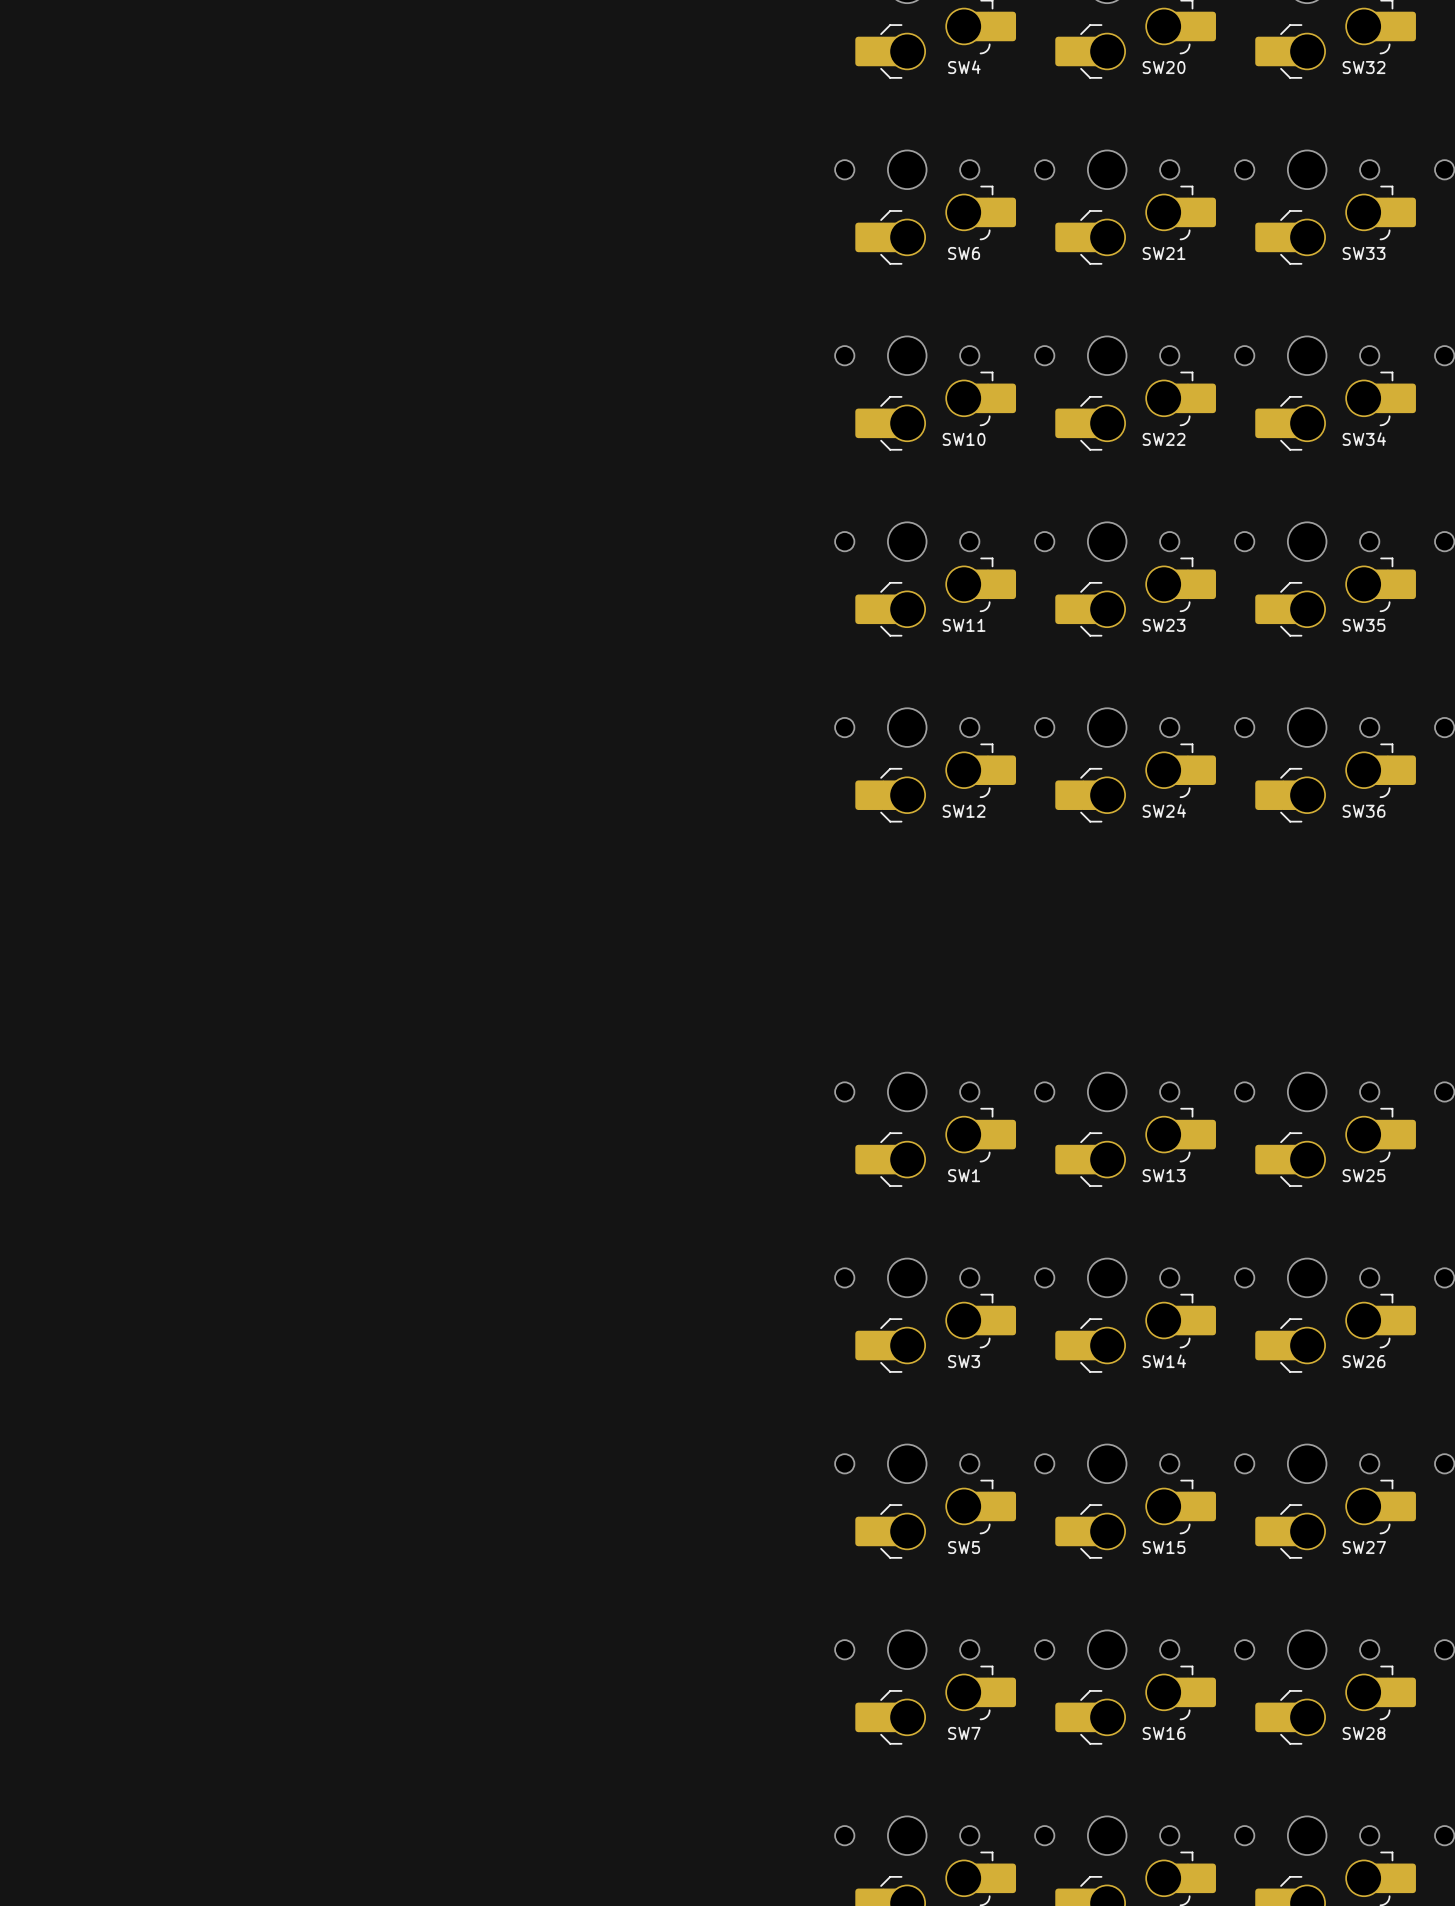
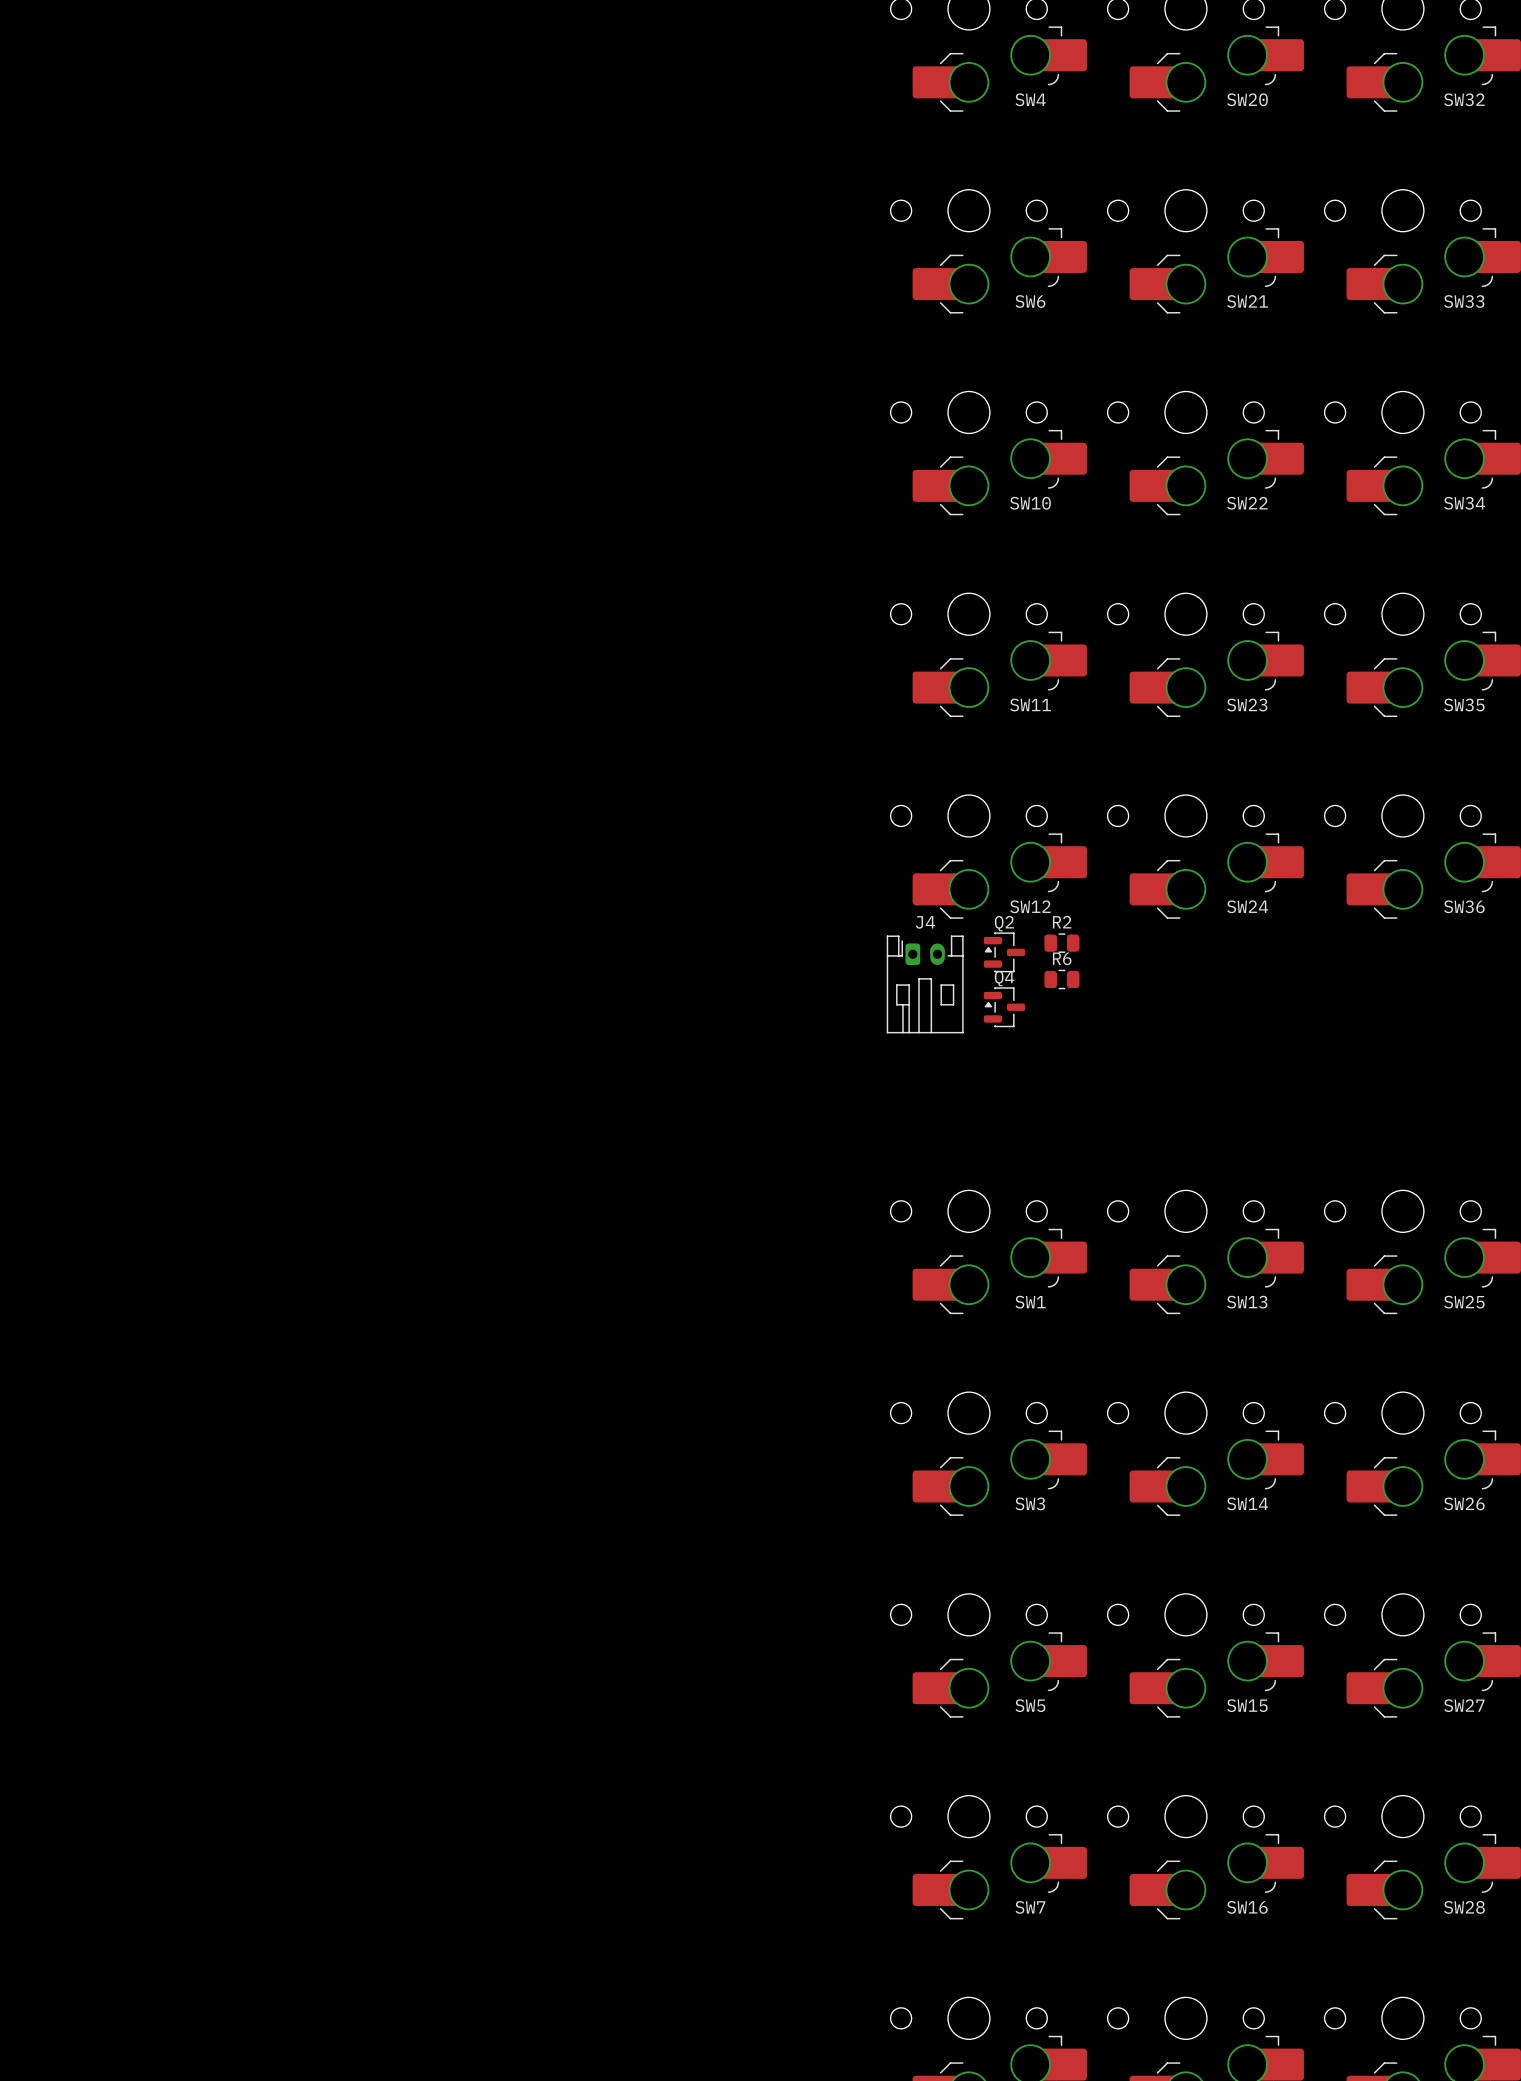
R2: none -> (1061, 943)
Q2: none -> (1004, 952)
R6: none -> (1061, 979)
J4: none -> (925, 984)
Q4: none -> (1004, 1007)

